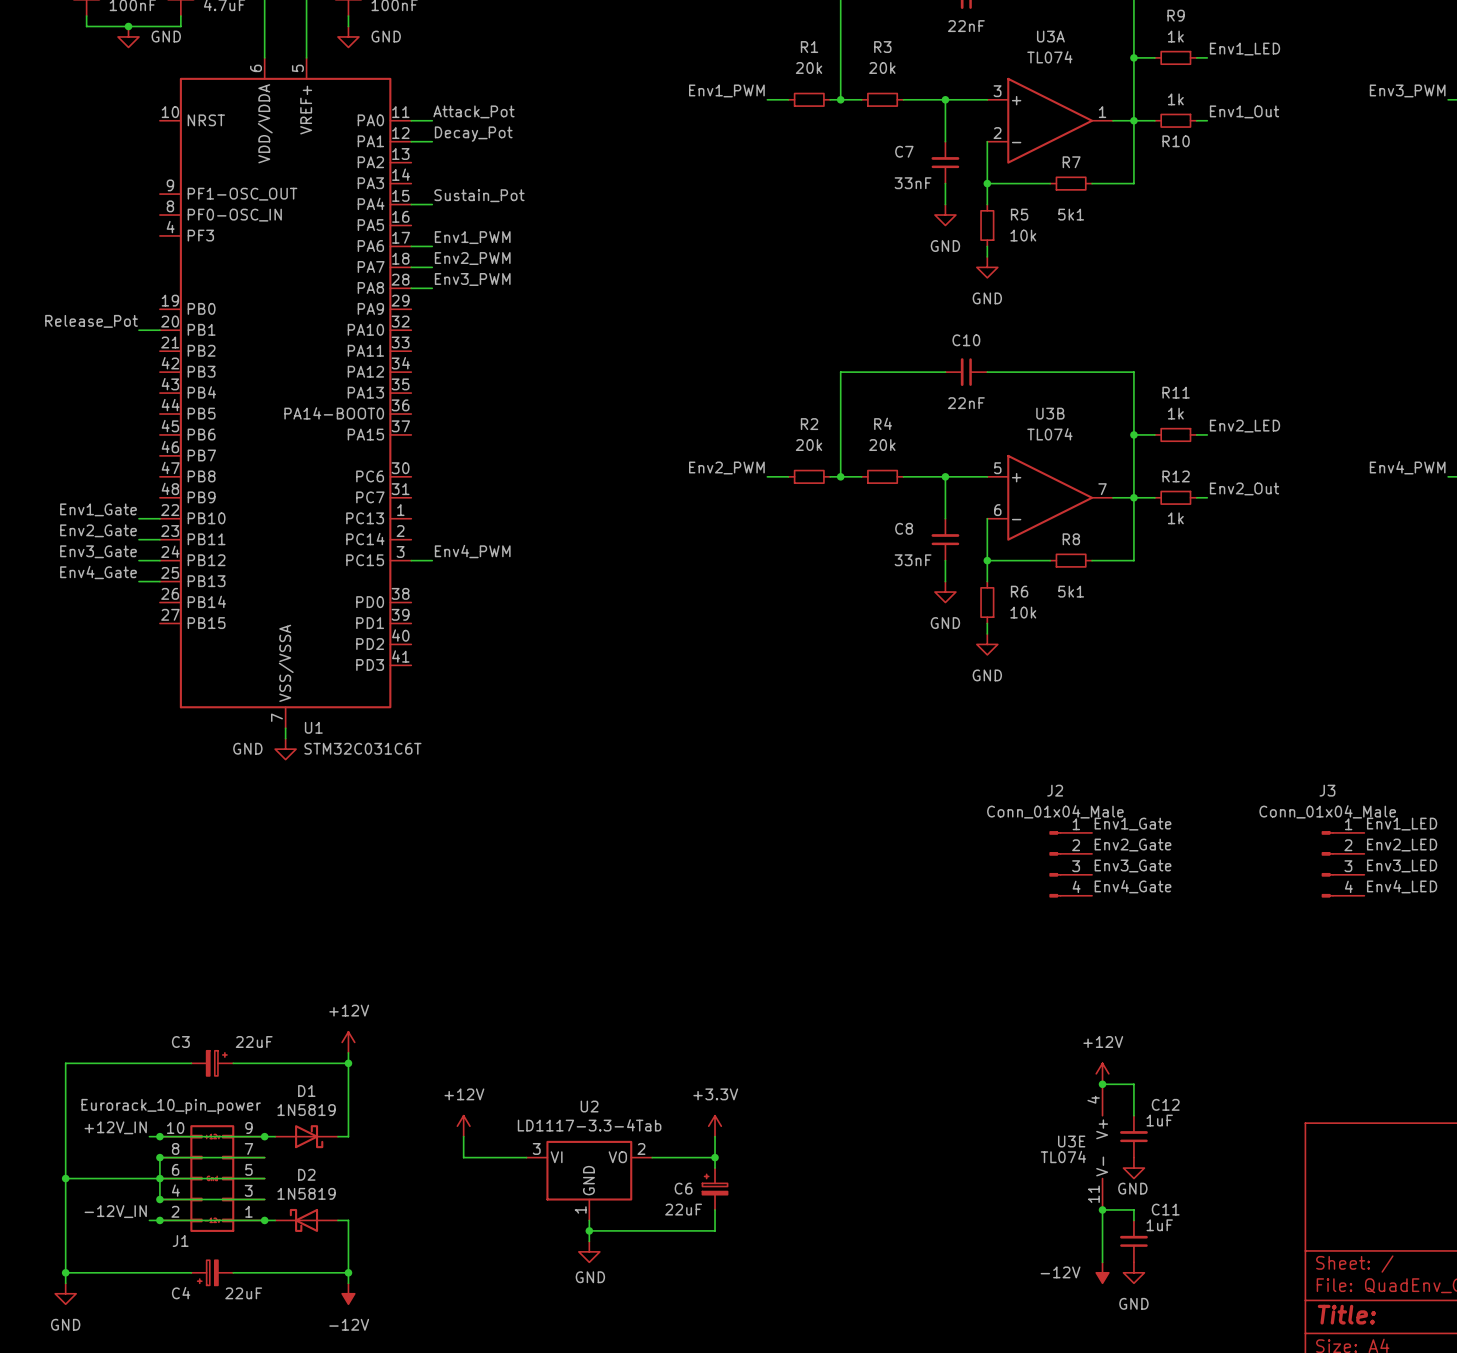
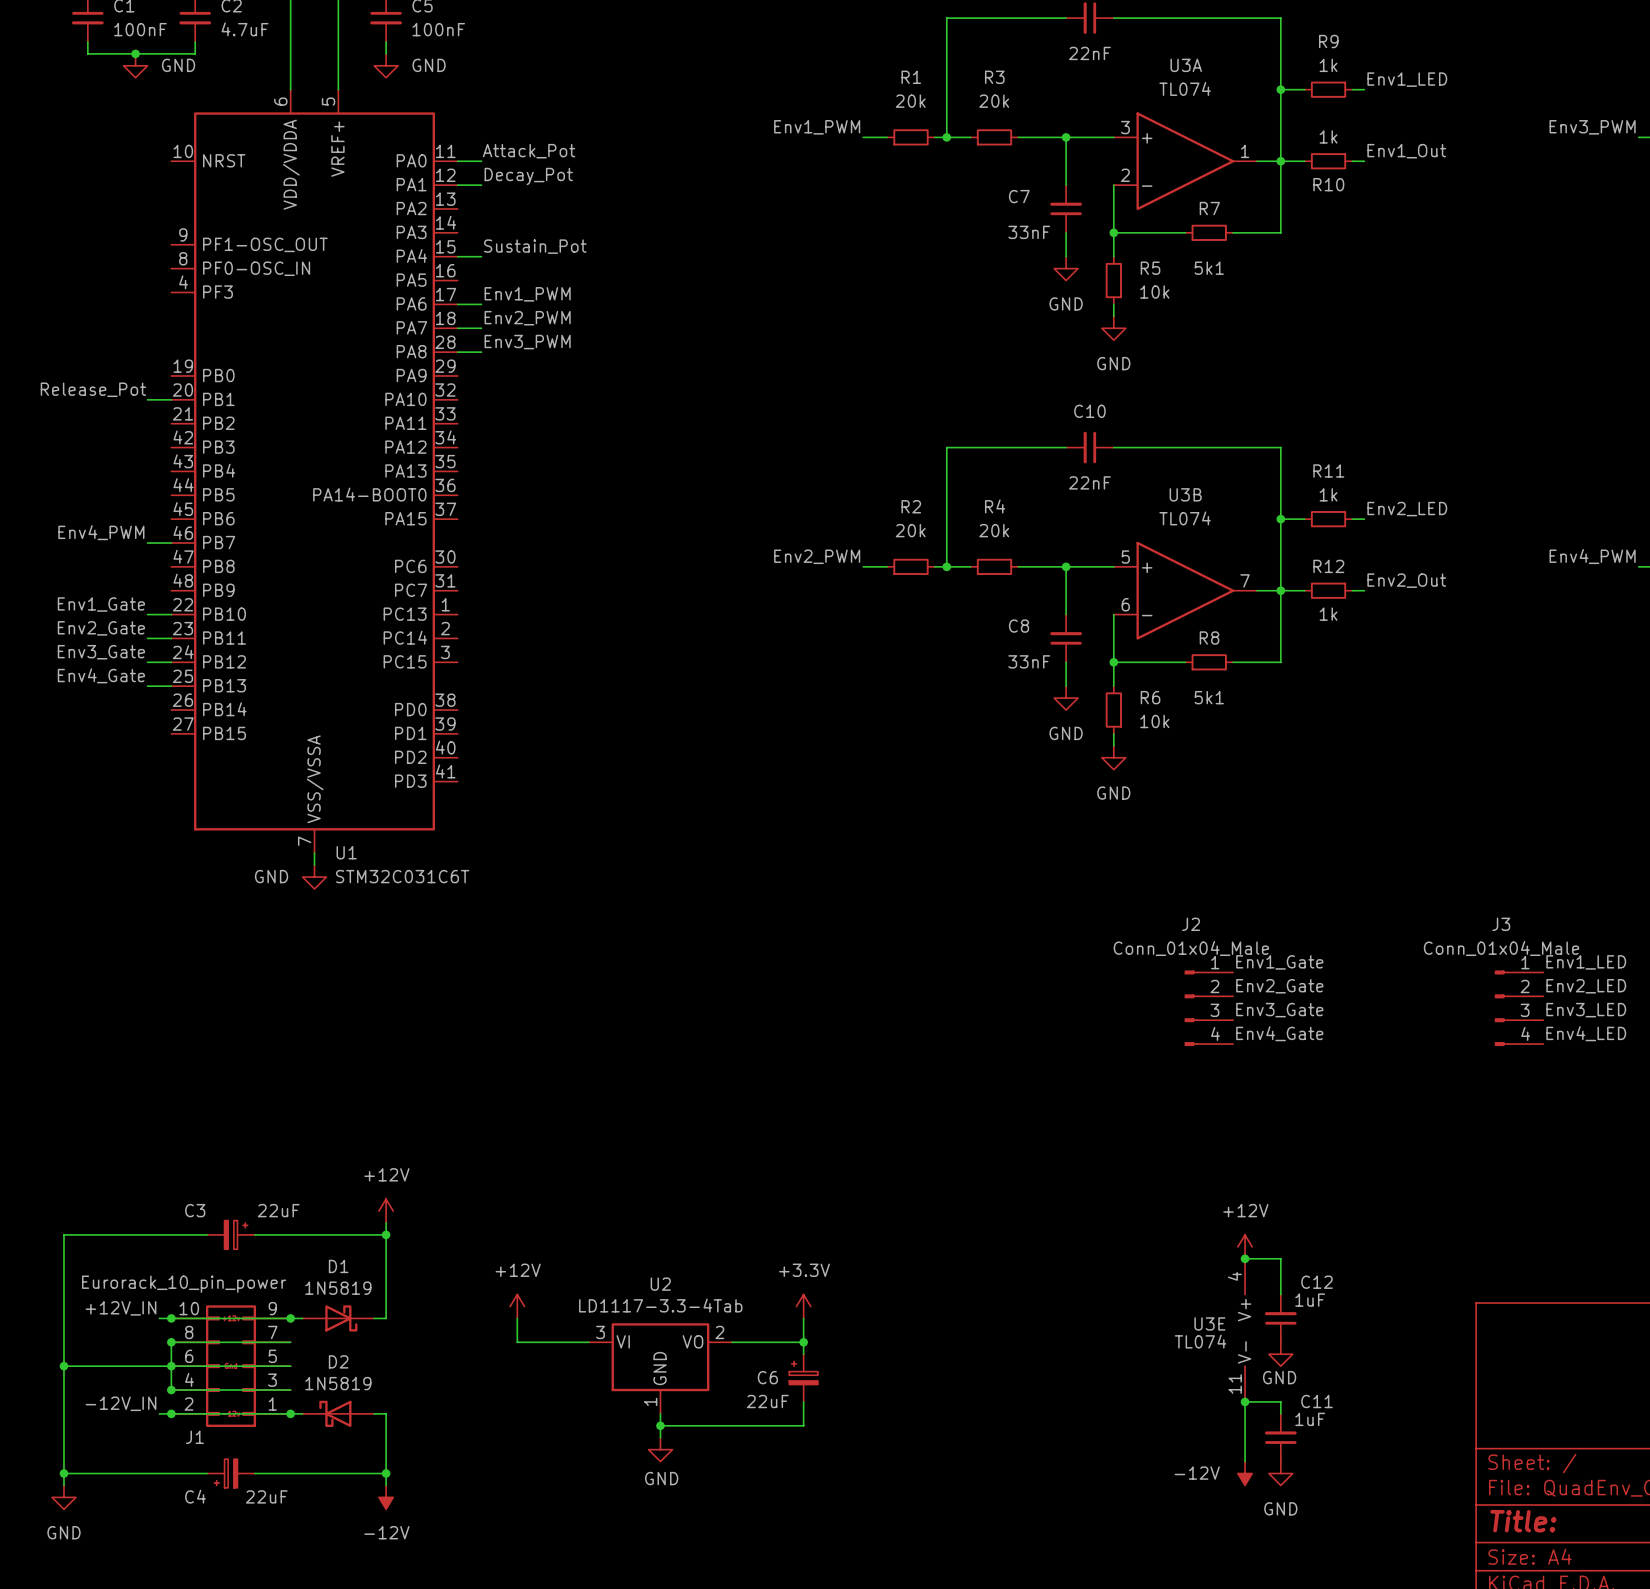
label: none -> Env4_PWM (101, 532)
wire: none -> (147, 543) (171, 543)
label: Env4_PWM (472, 551) -> none
wire: (411, 560) (432, 560) -> none

